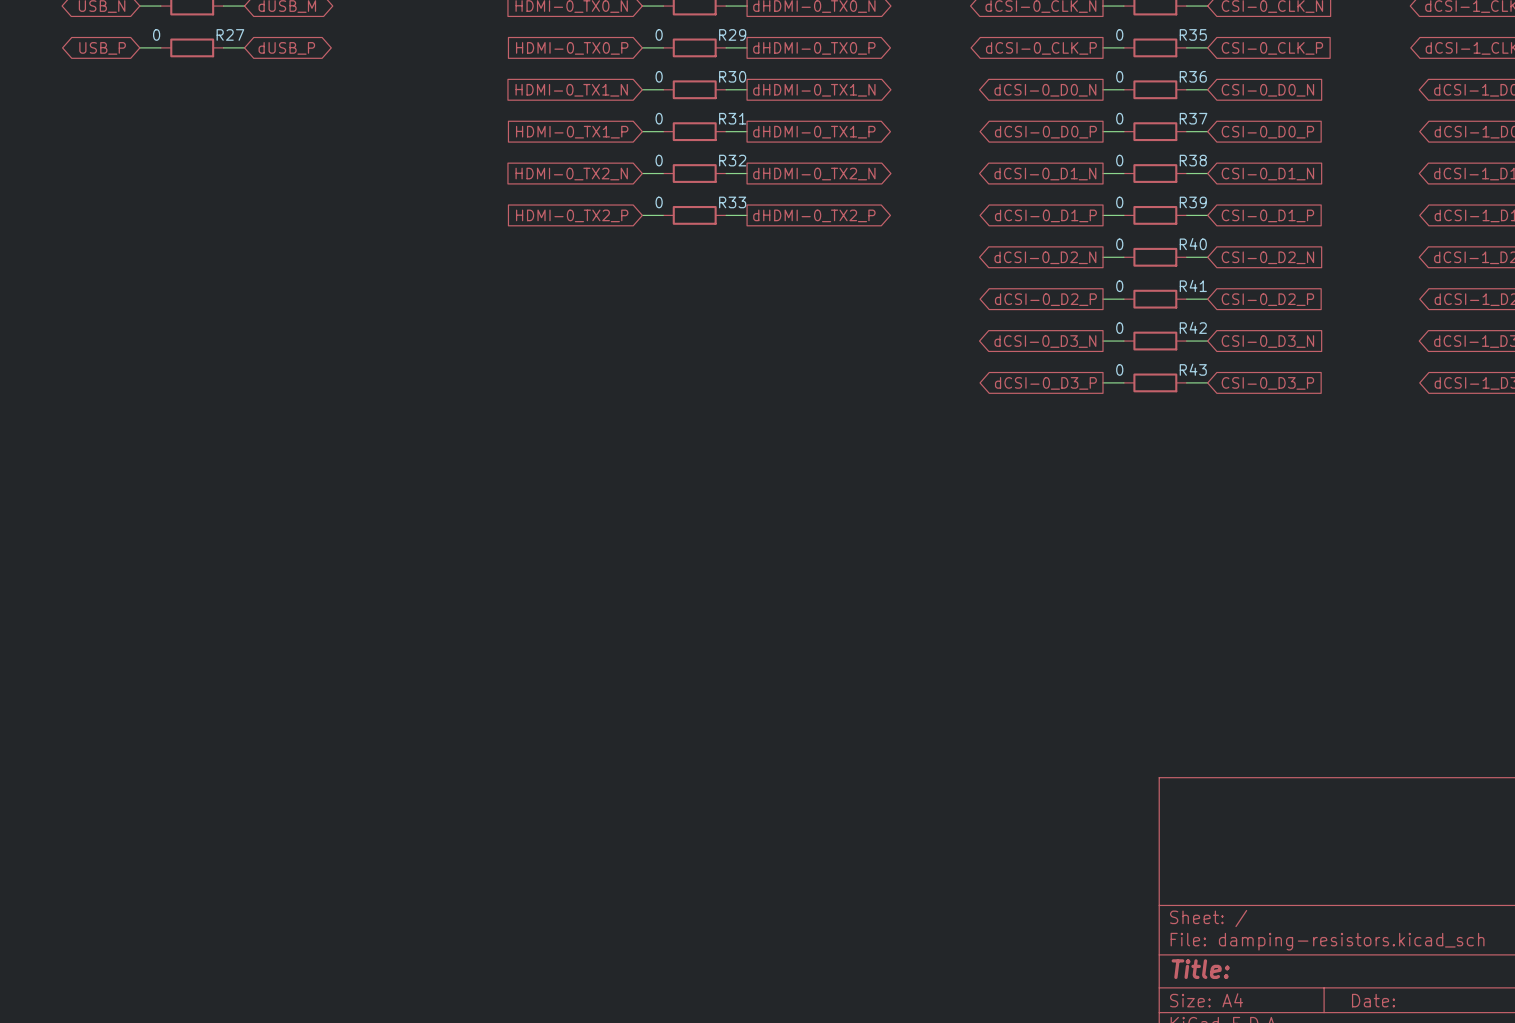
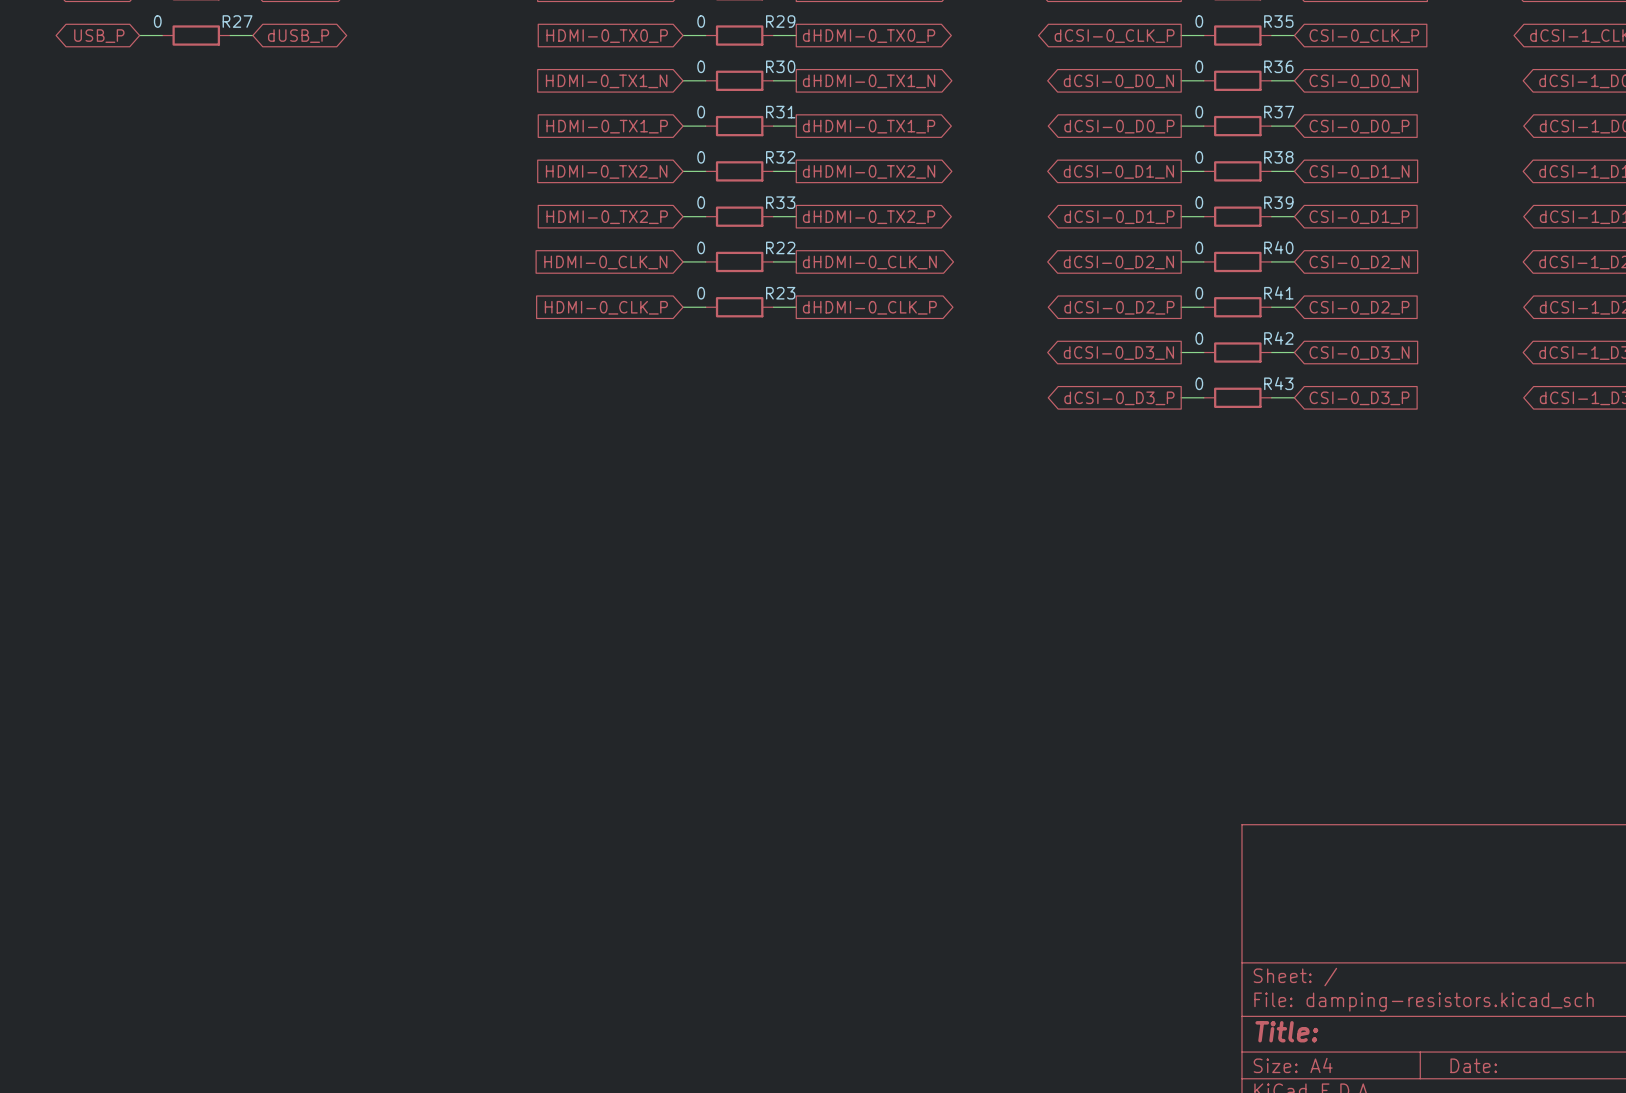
global label: none -> HDMI-0_CLK_N (605, 262)
wire: none -> (683, 261) (705, 261)
R22: none -> 0 (739, 261)
wire: none -> (773, 261) (796, 261)
global label: none -> dHDMI-0_CLK_N (869, 262)
global label: none -> HDMI-0_CLK_P (606, 307)
wire: none -> (683, 307) (705, 307)
R23: none -> 0 (739, 307)
wire: none -> (773, 307) (796, 307)
global label: none -> dHDMI-0_CLK_P (869, 307)

